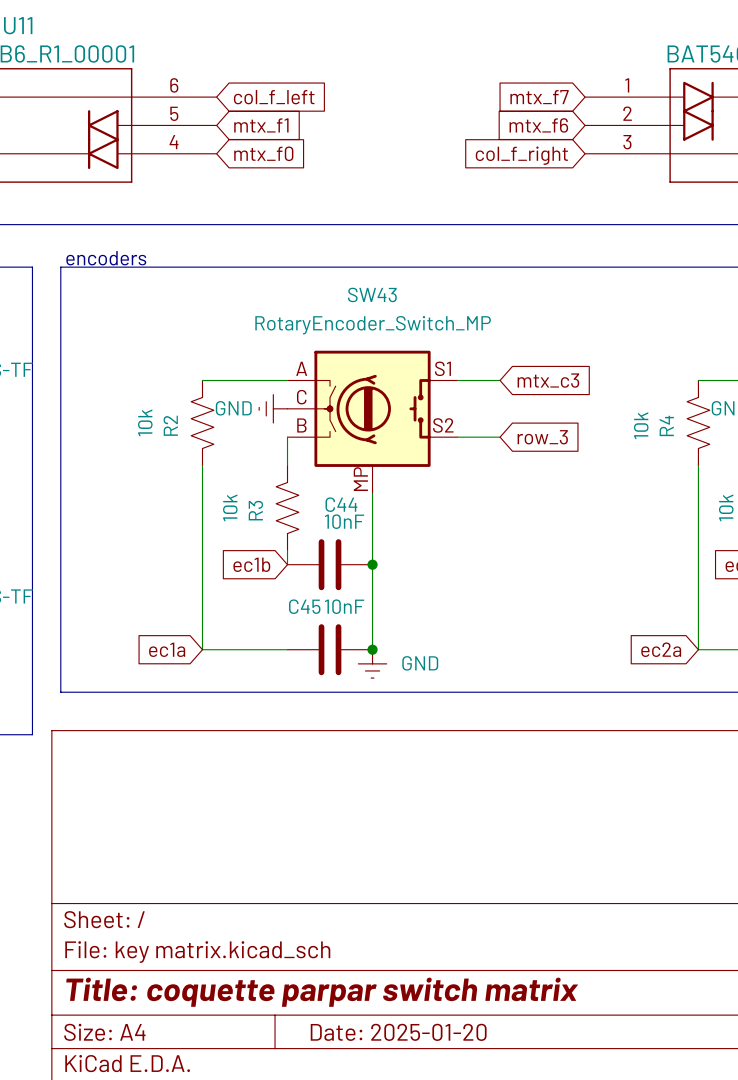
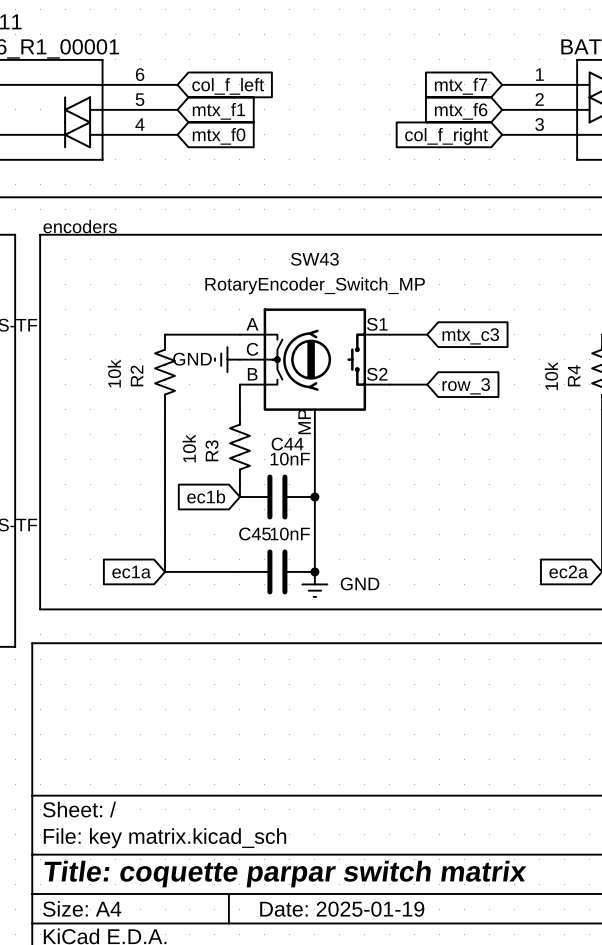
title block: Date: 2025-01-20 (398, 1032) -> Date: 2025-01-19 (342, 909)

